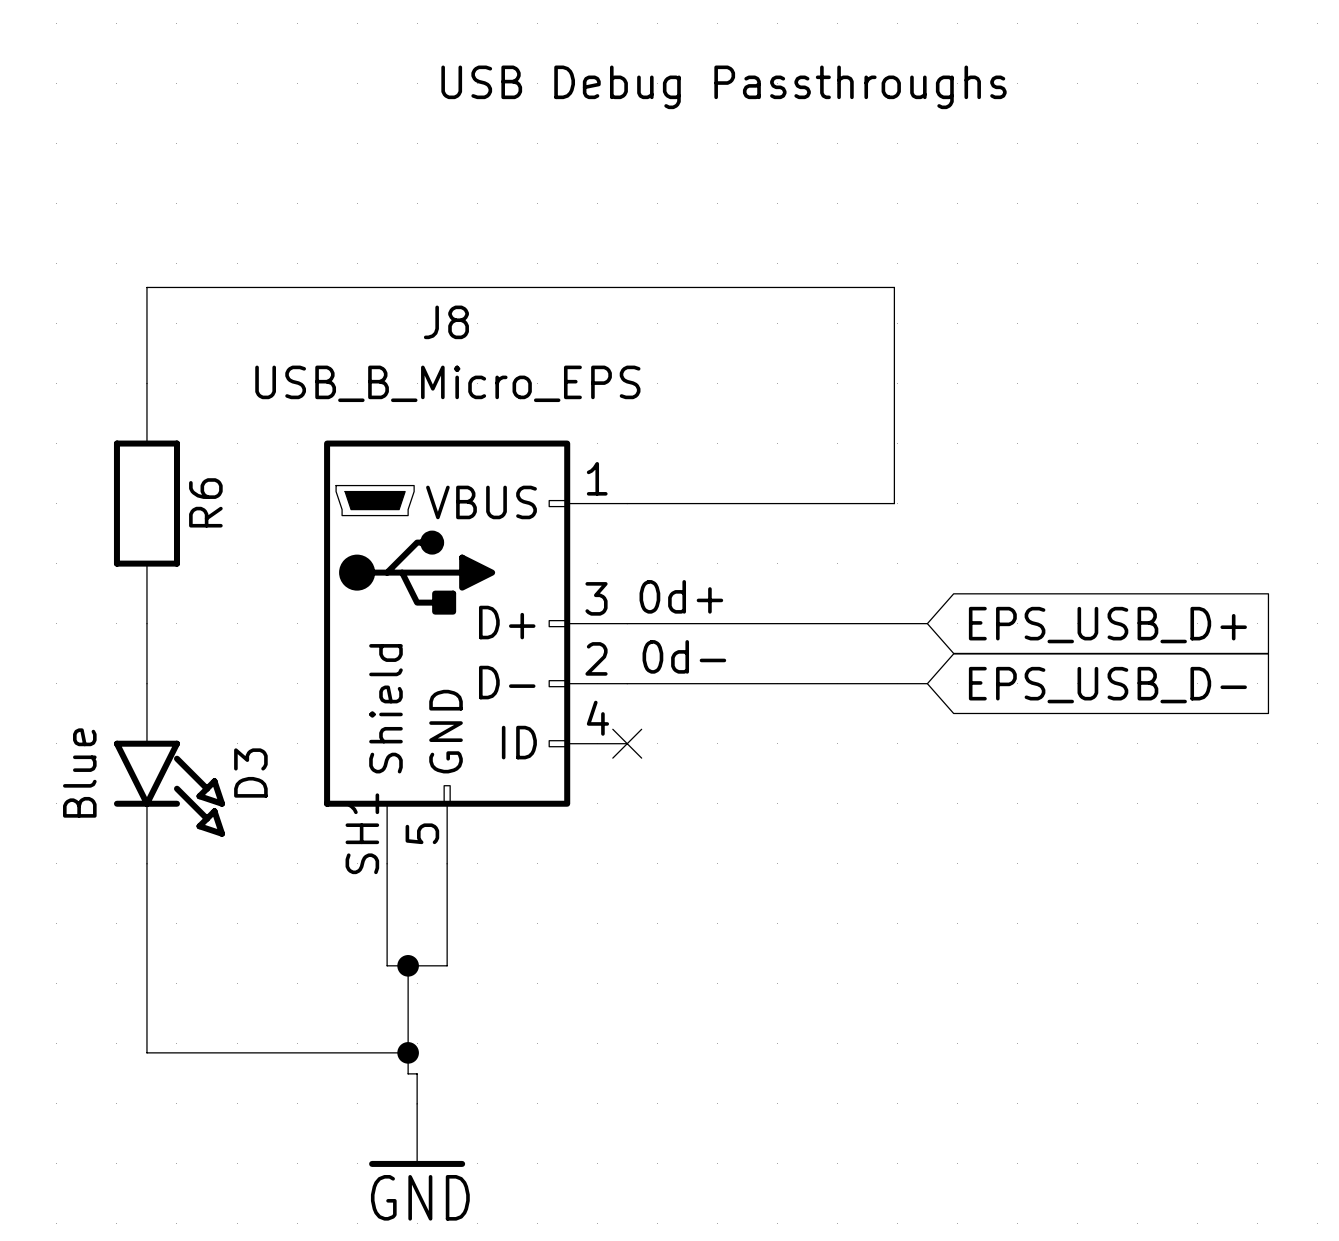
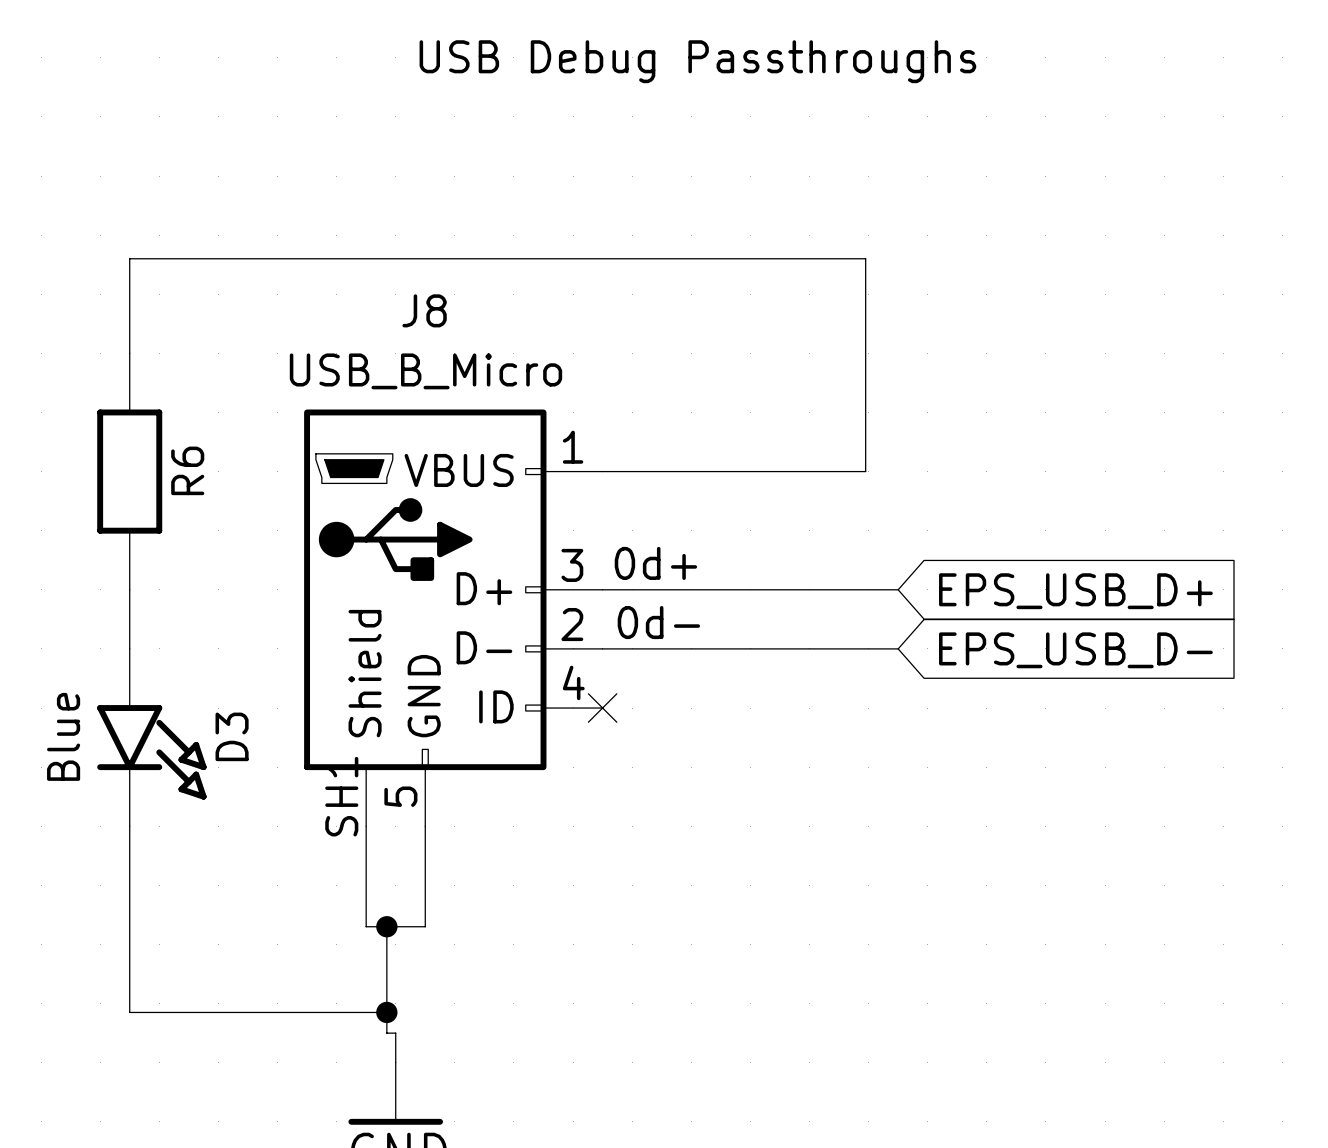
J8 name position: J8 (446, 322) -> J8 (424, 310)
J8 value: USB_B_Micro_EPS (447, 383) -> USB_B_Micro (425, 371)

